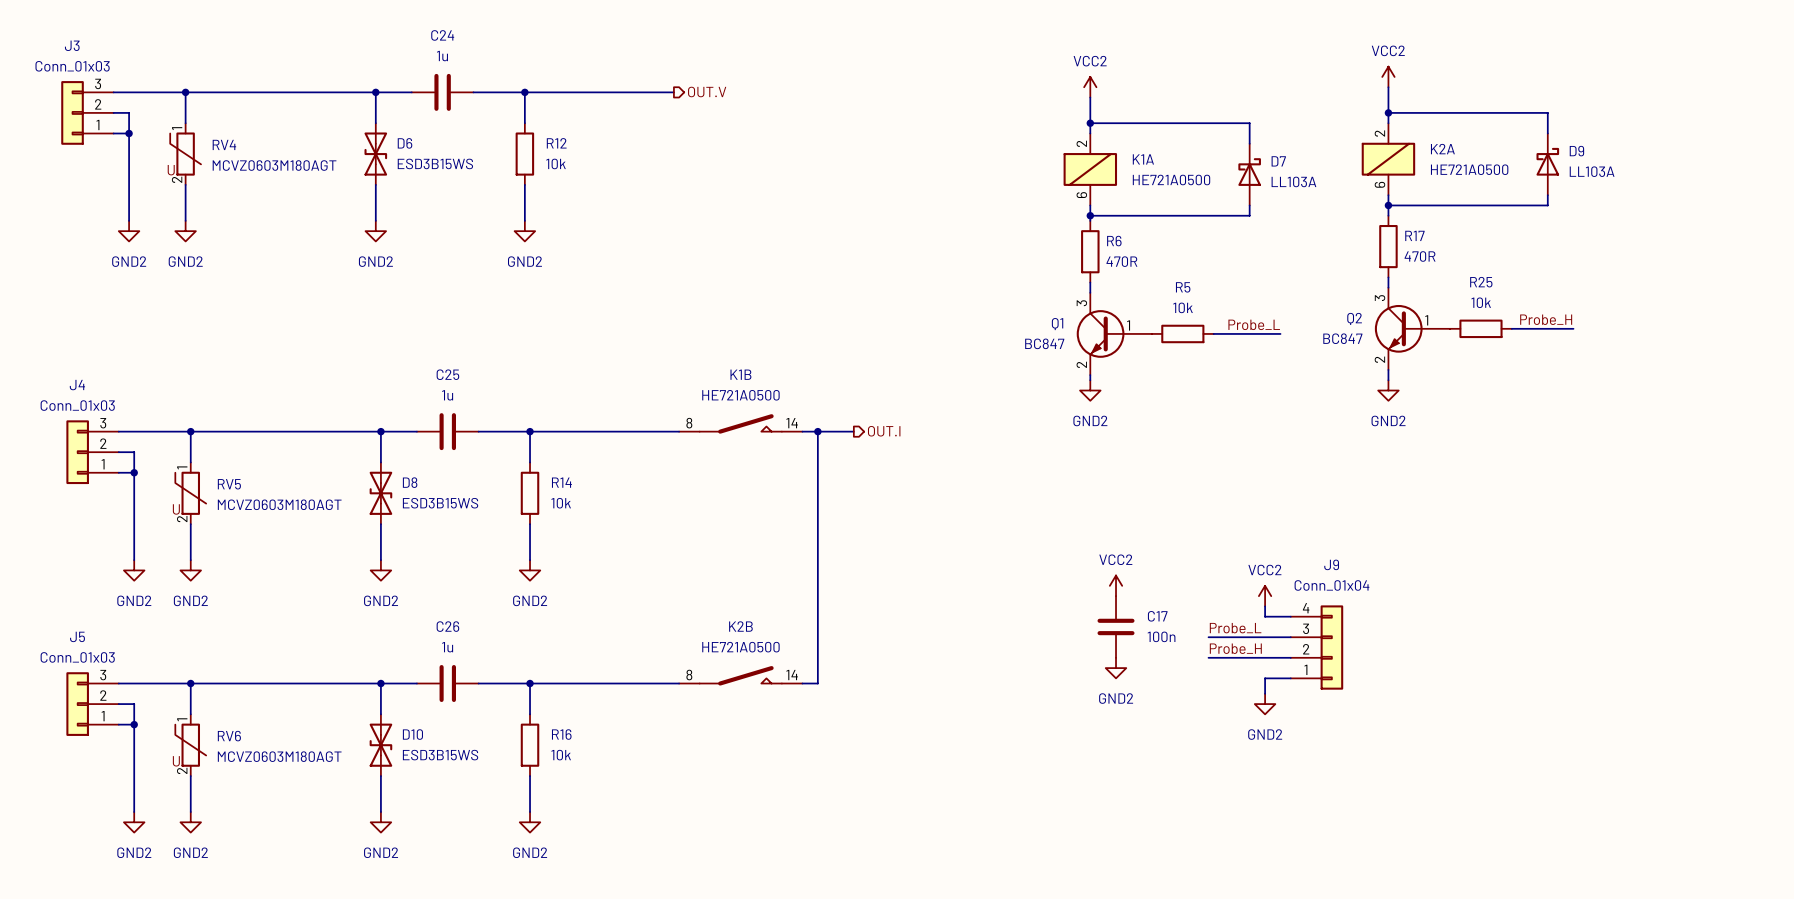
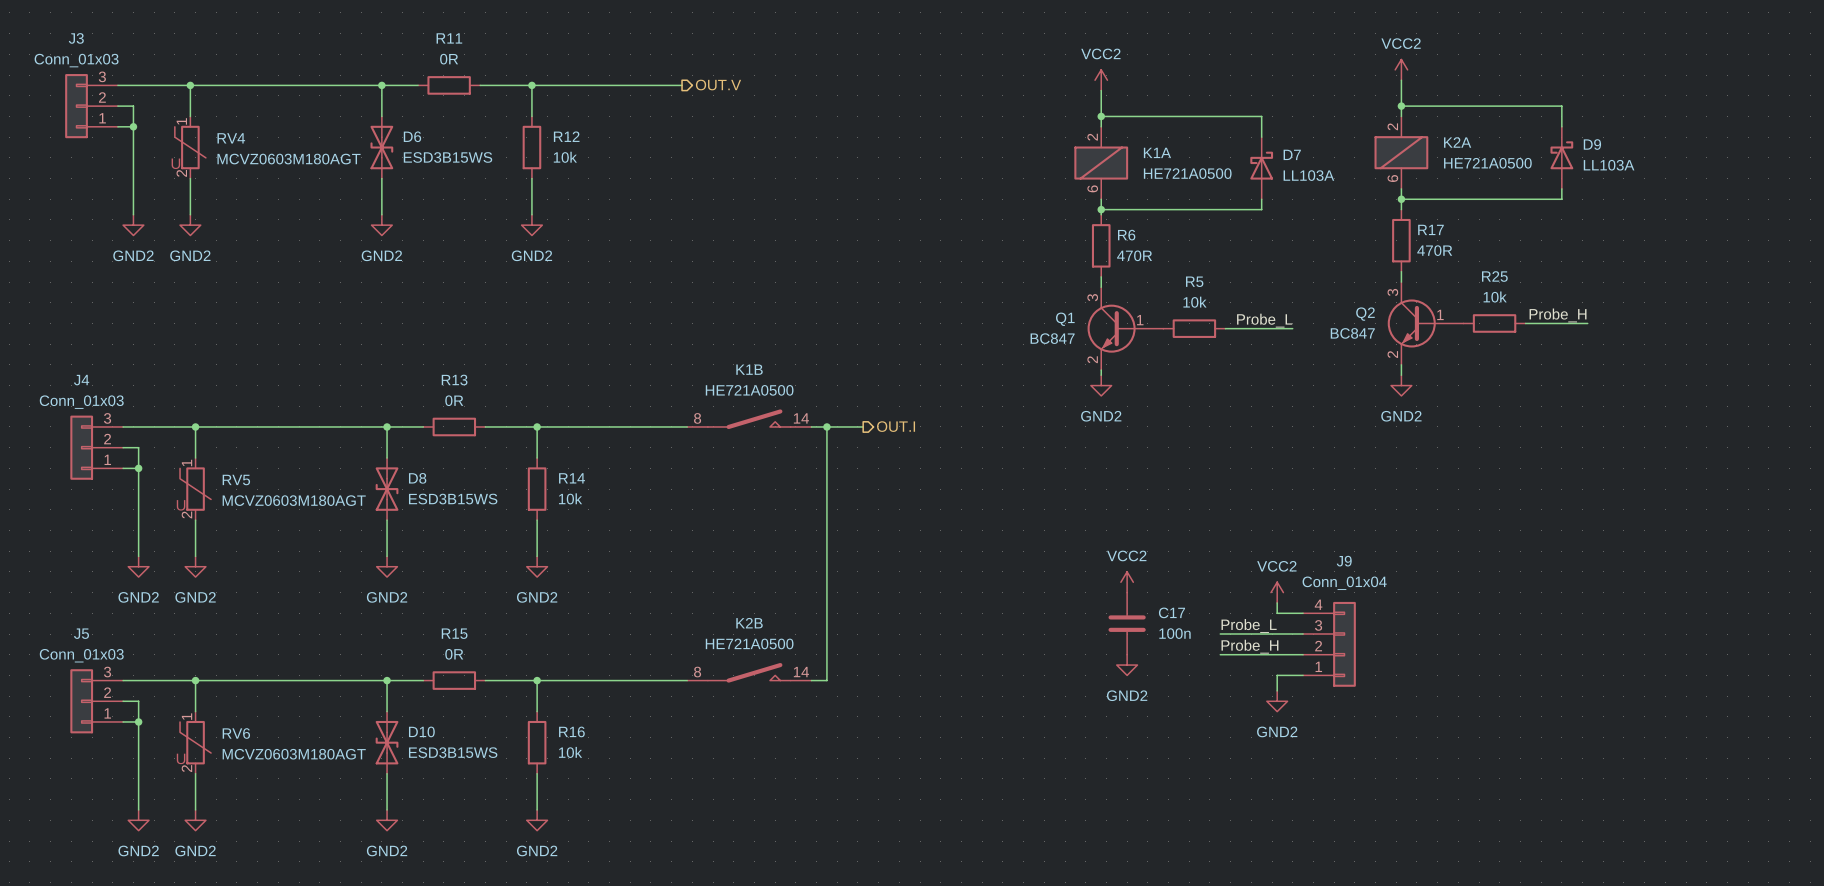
C24: 1u (442, 92) -> none
R11: none -> 0R (449, 85)
C25: 1u (447, 431) -> none
R13: none -> 0R (454, 426)
C26: 1u (447, 683) -> none
R15: none -> 0R (454, 680)

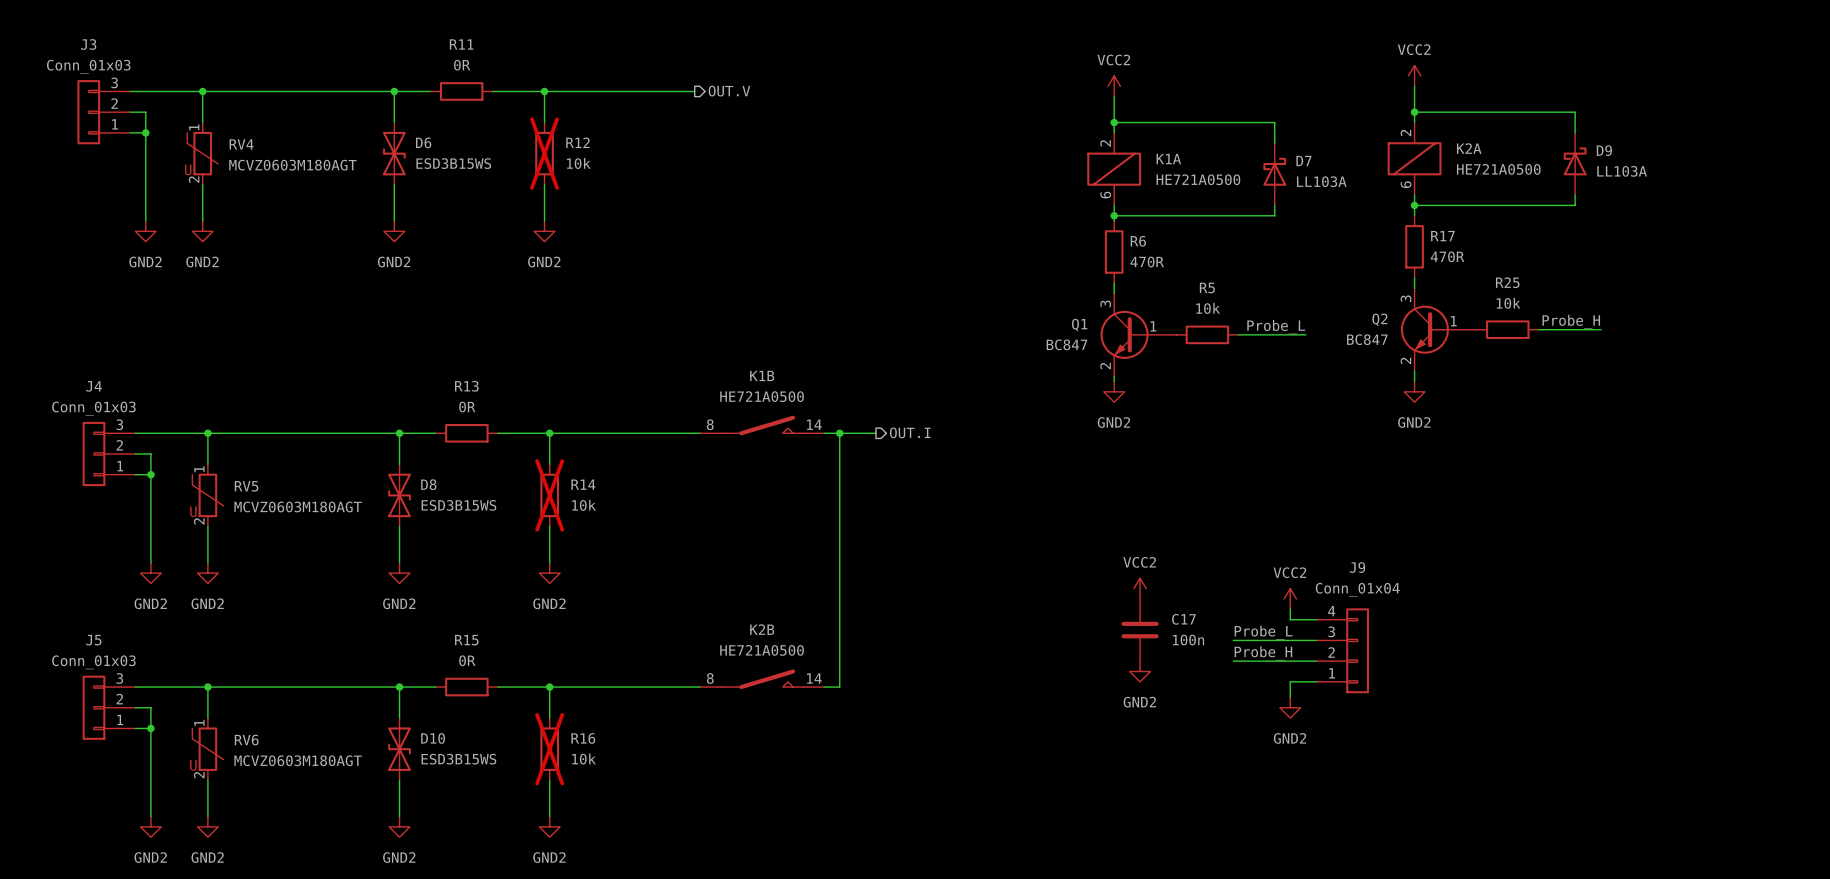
R12 do-not-place cross: none -> (544, 153)
R14 do-not-place cross: none -> (549, 495)
R16 do-not-place cross: none -> (549, 749)

